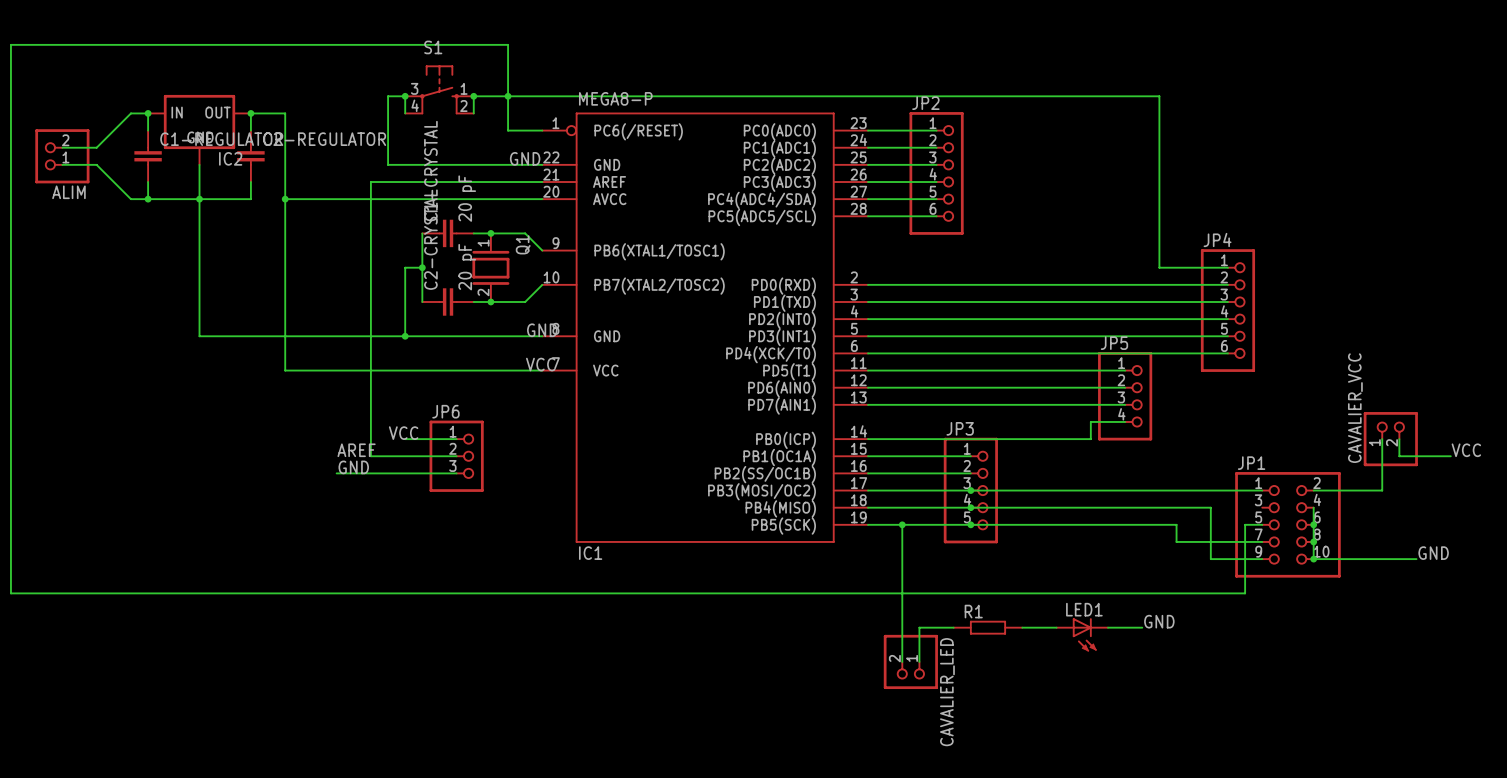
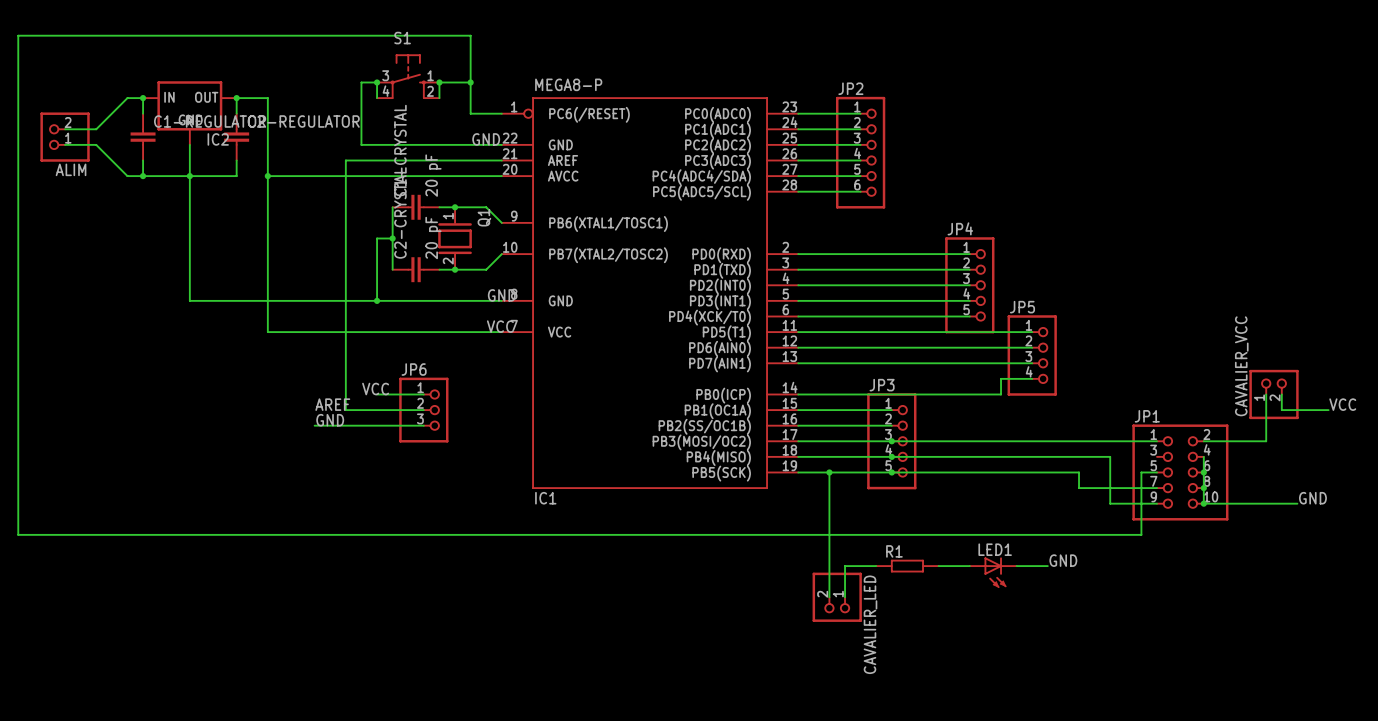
wire: (508, 96) (1159, 96) (1159, 267) (1227, 267) -> none
JP4 symbol: [1200, 249, 1256, 372] -> [945, 237, 995, 334]
wire: (1056, 284) (1227, 284) -> none
wire: (1056, 301) (1227, 301) -> none
wire: (1056, 319) (1227, 319) -> none
wire: (1056, 336) (1227, 336) -> none
wire: (1056, 353) (1227, 353) -> none

